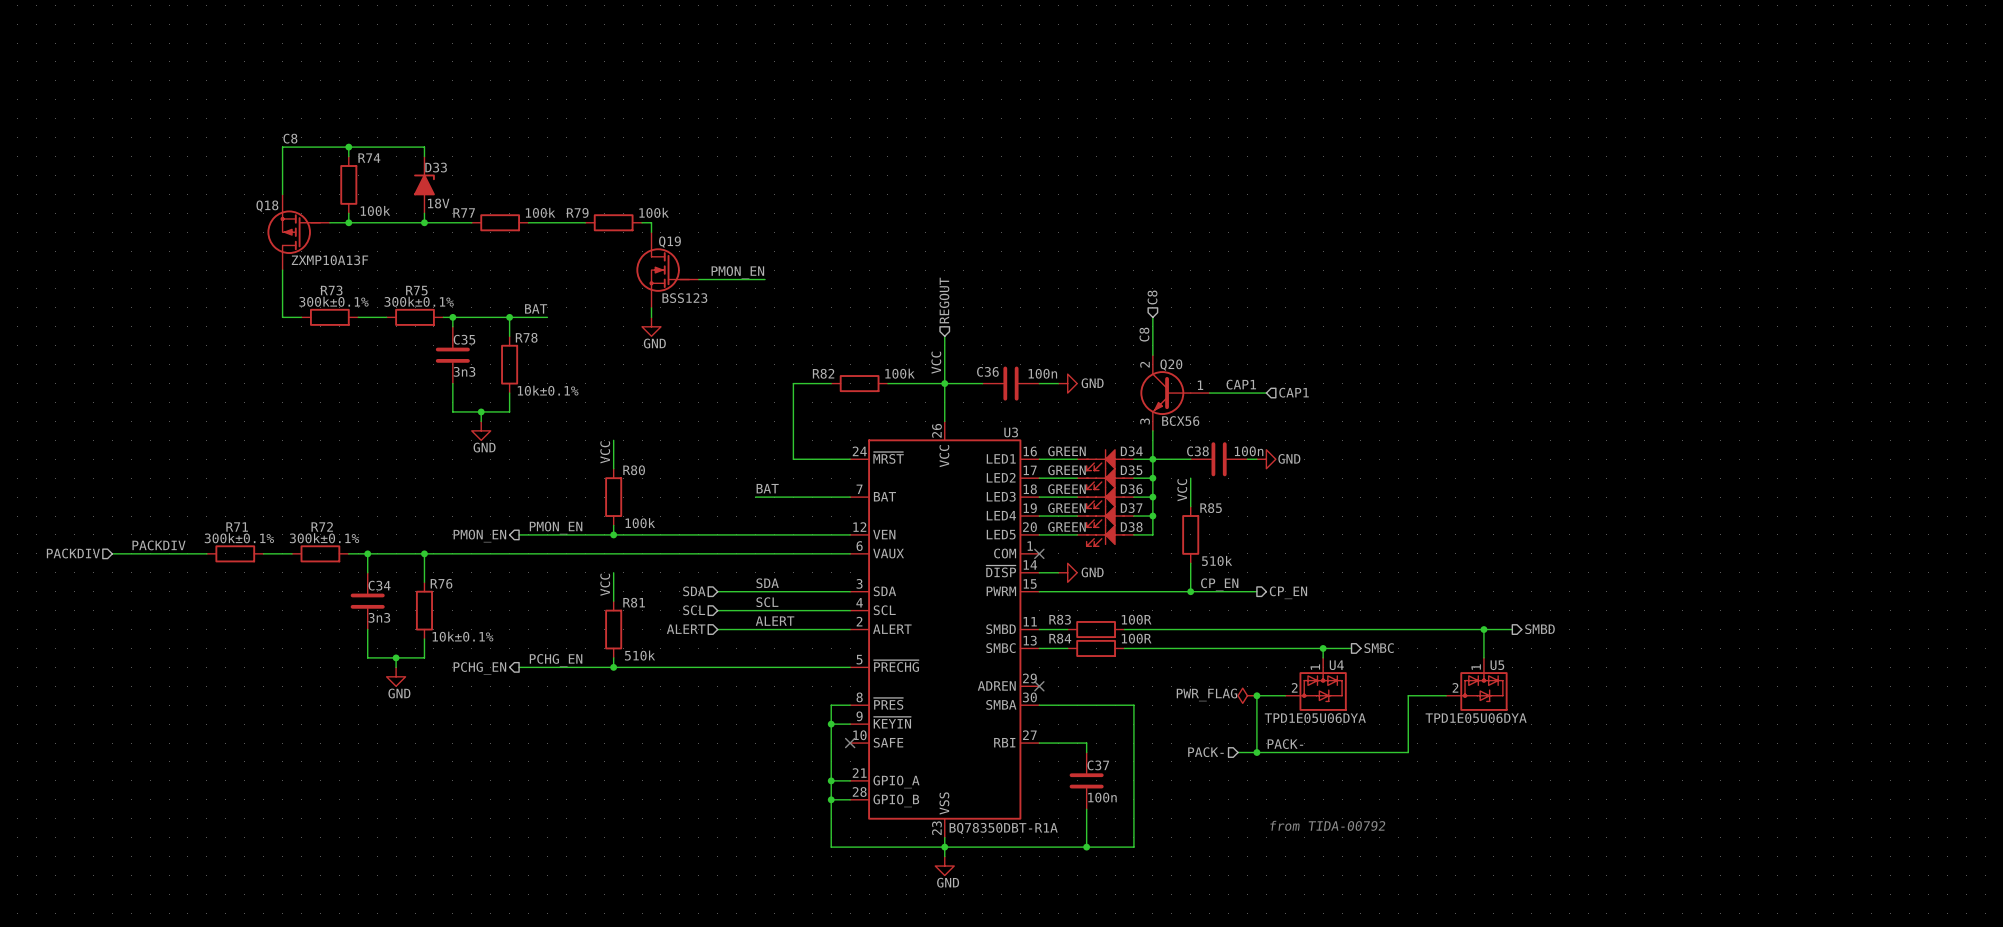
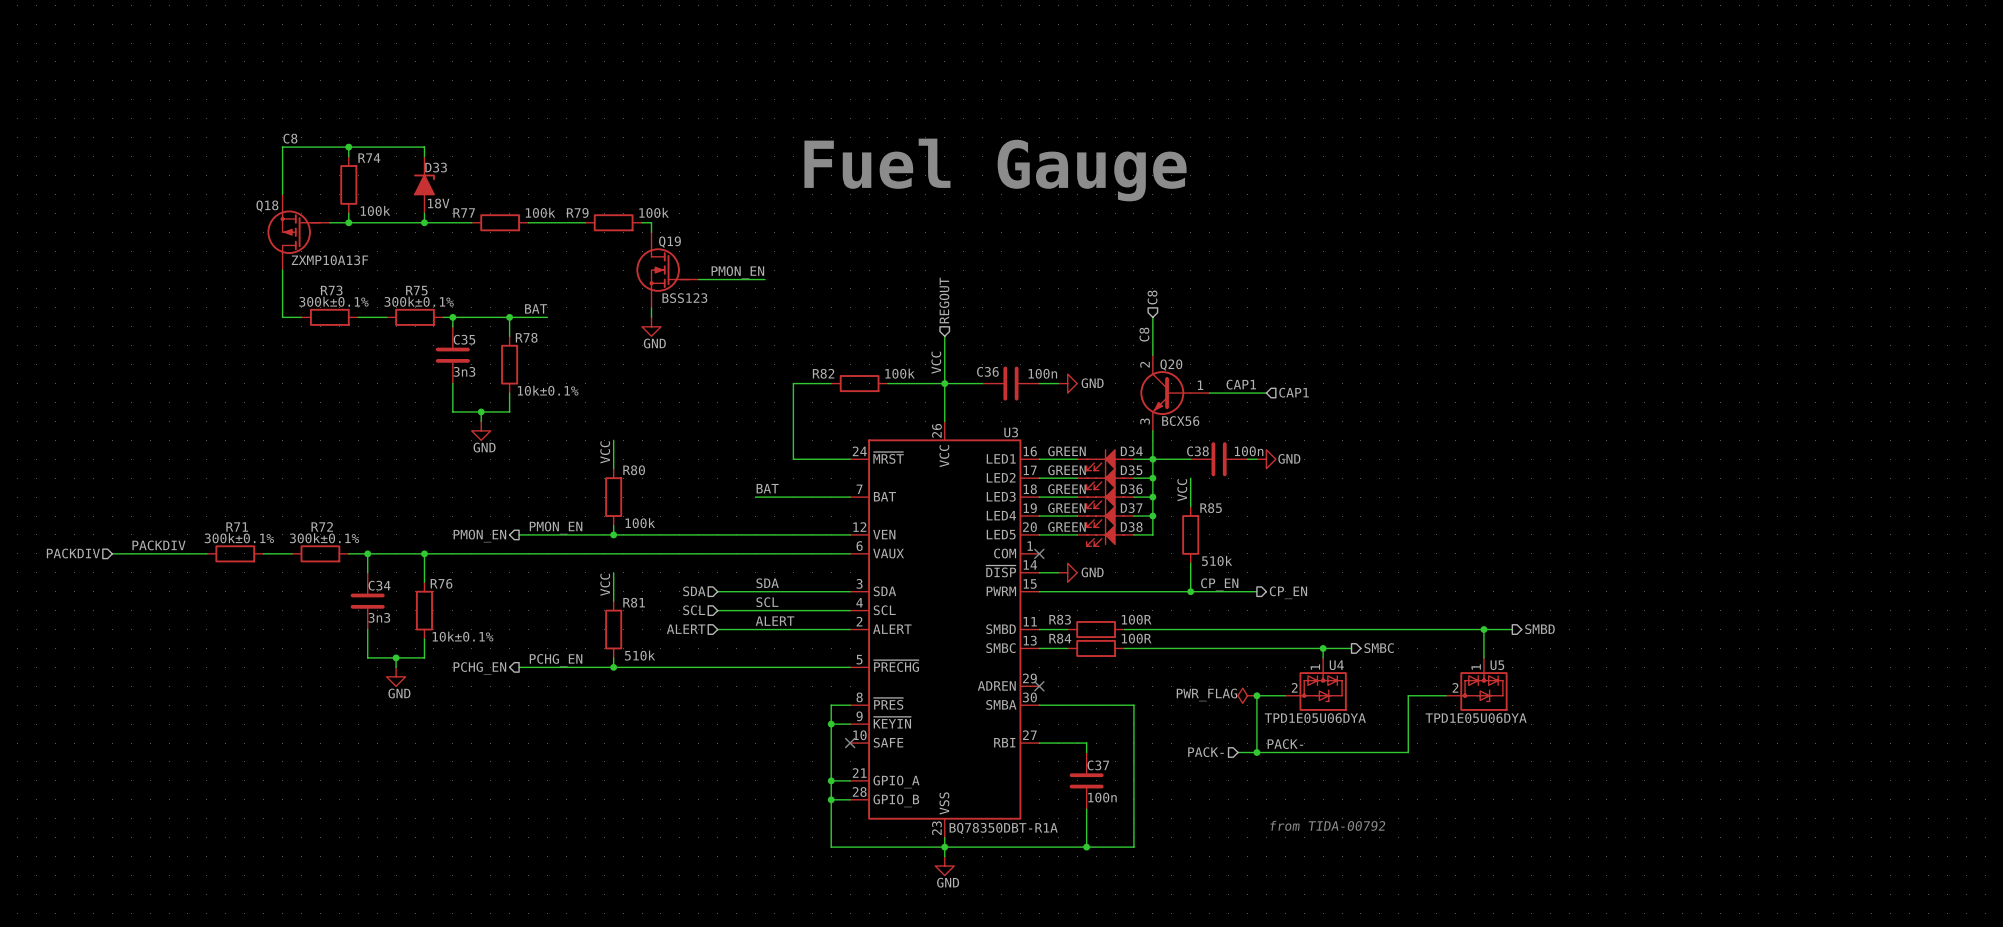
text: none -> Fuel Gauge (995, 169)

